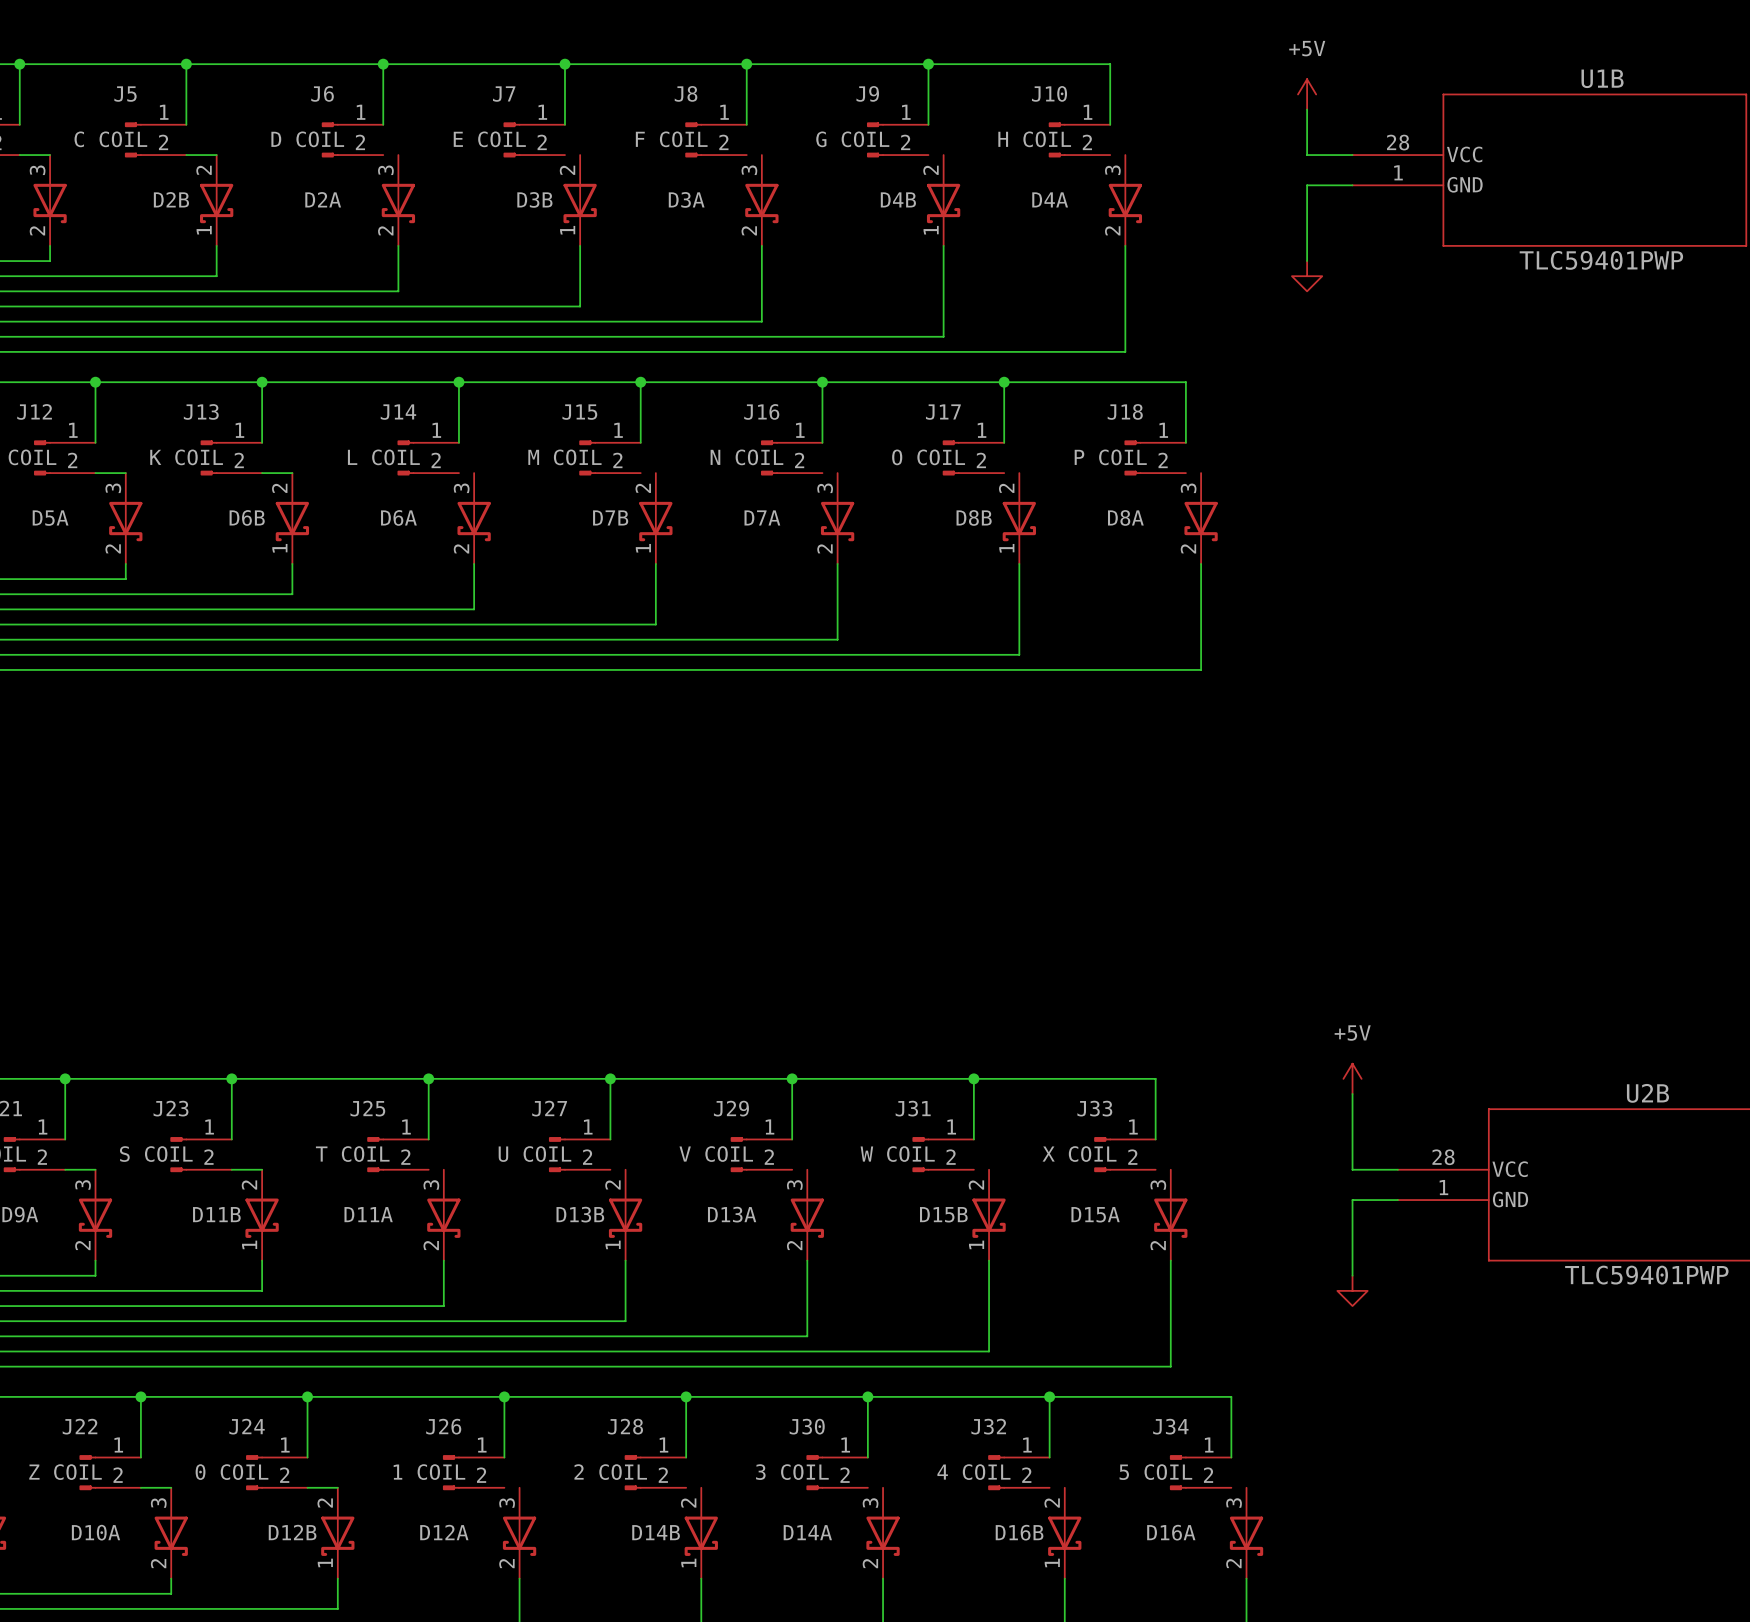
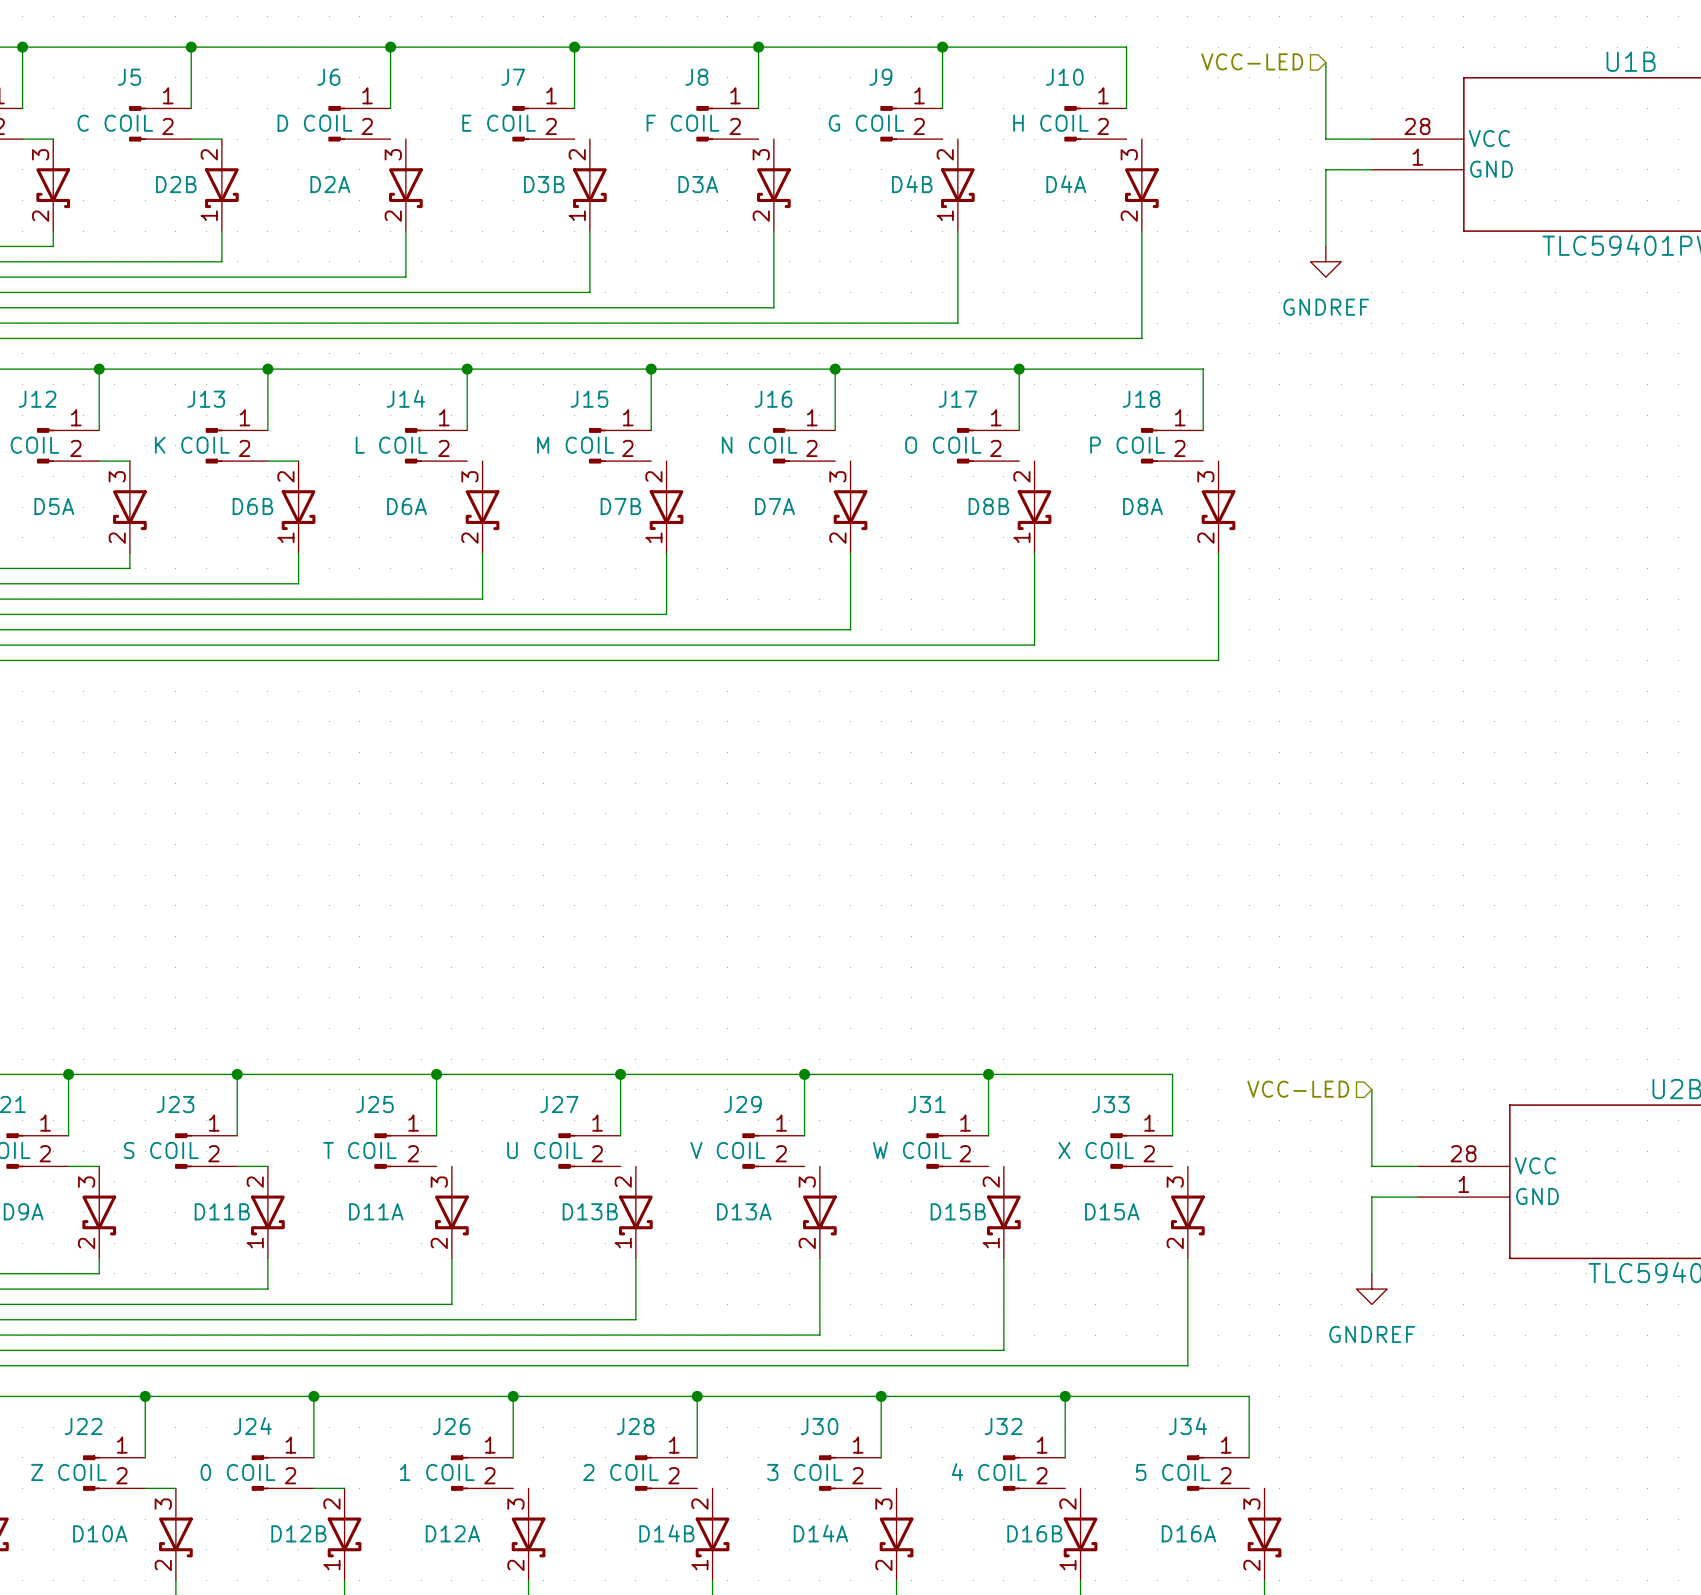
hierarchical label: none -> VCC-LED (1252, 61)
power symbol: +5V (1307, 94) -> none
power symbol text: none -> GNDREF (1326, 307)
power symbol: +5V (1352, 1078) -> none
hierarchical label: none -> VCC-LED (1298, 1089)
power symbol text: none -> GNDREF (1372, 1334)

